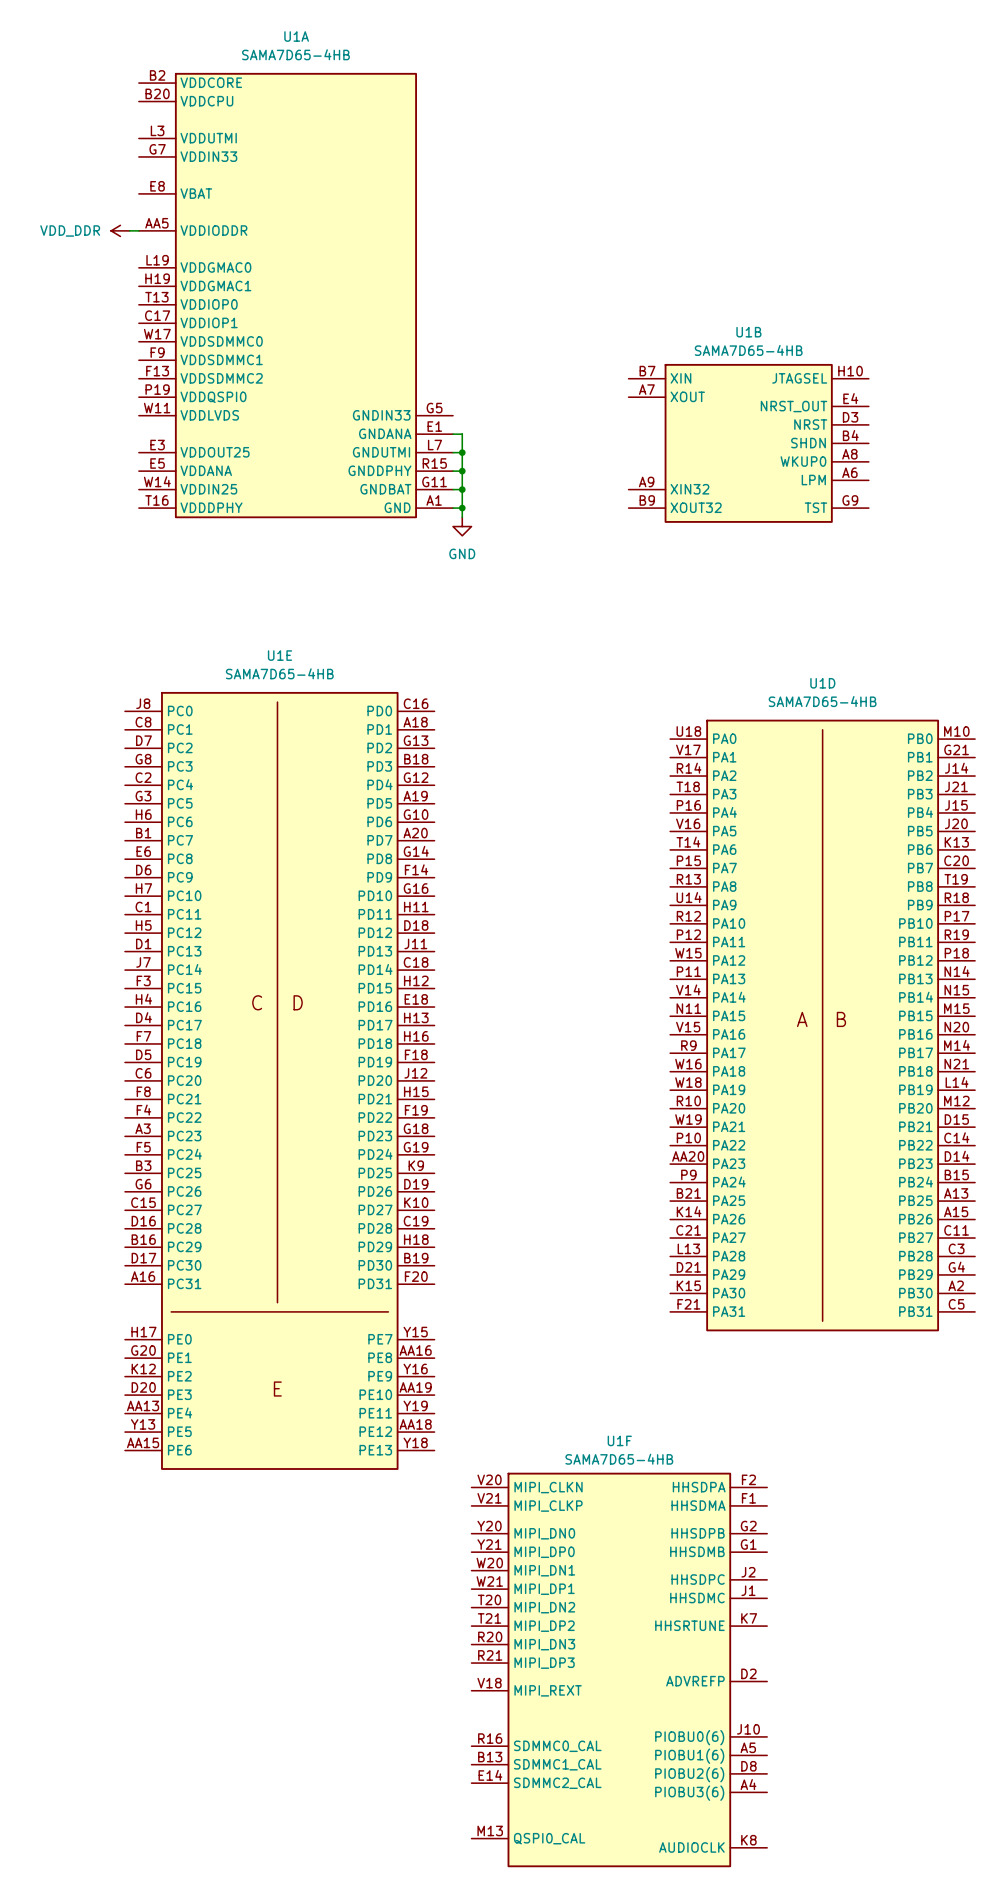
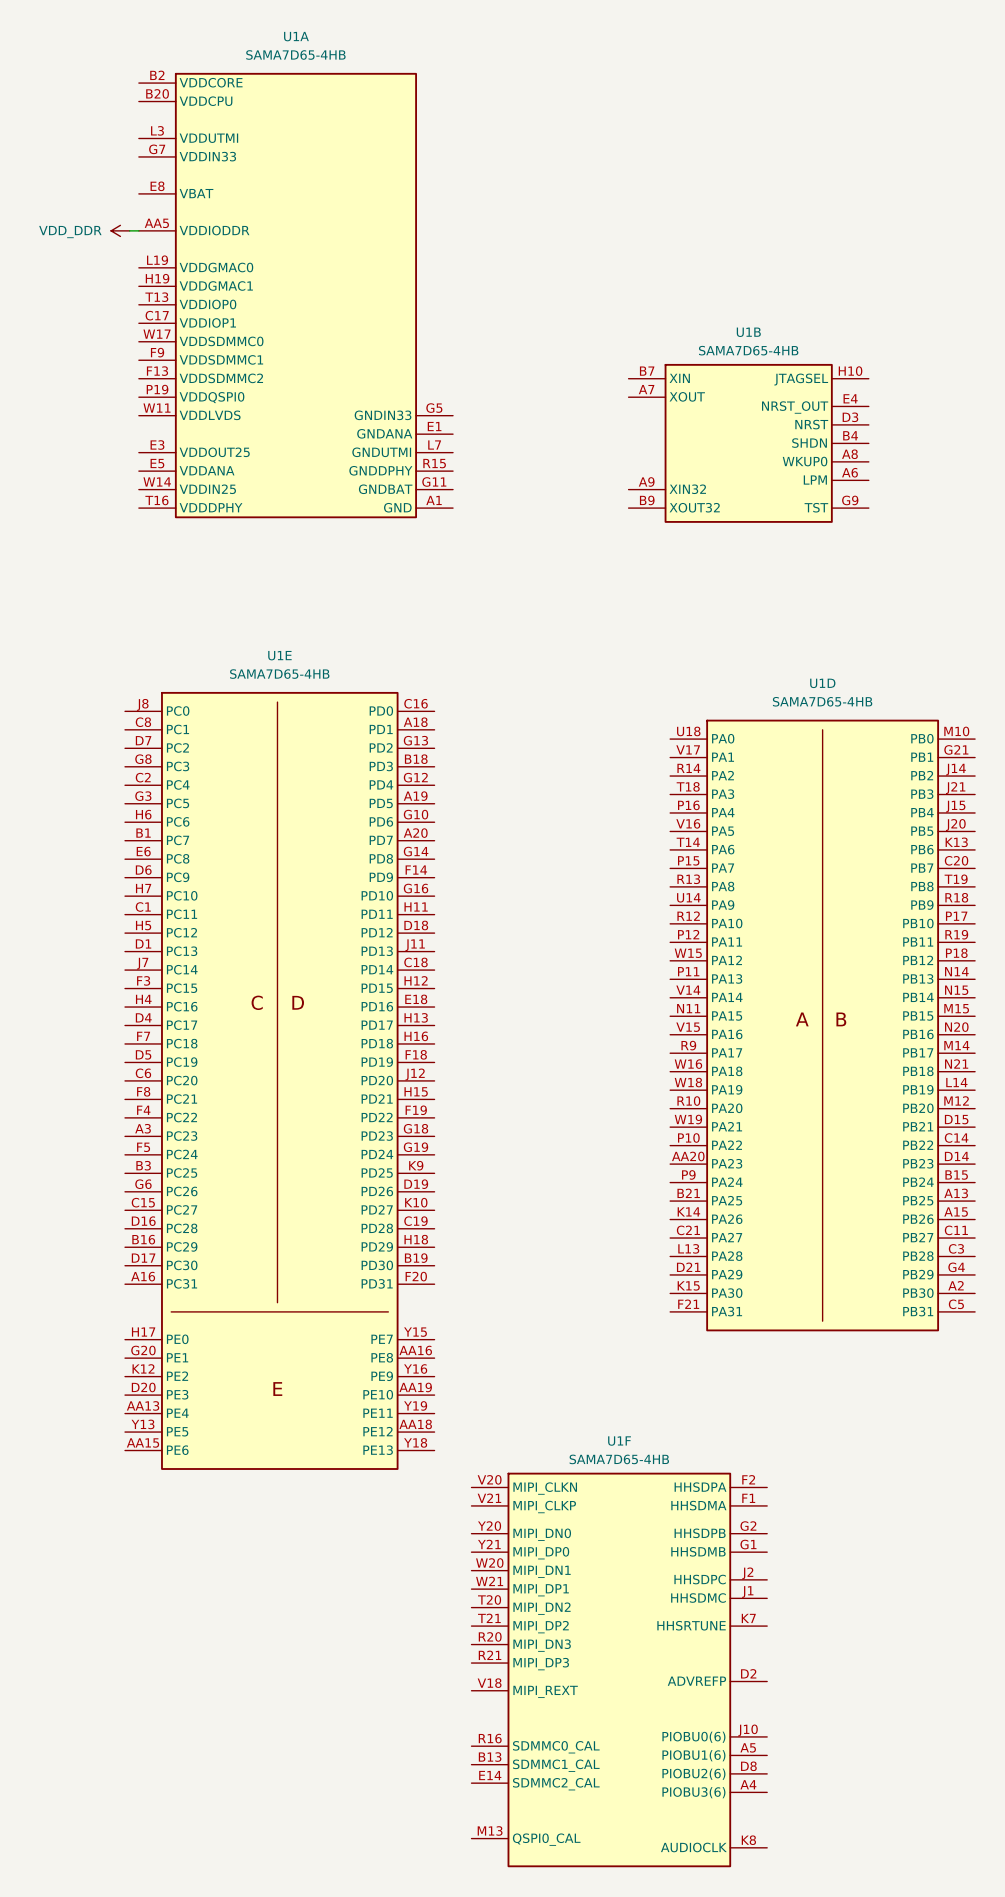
wire: (453, 434) (462, 434) (462, 517) -> none
wire: (453, 452) (462, 452) -> none
junction: (462, 452) -> none
wire: (453, 471) (462, 471) -> none
junction: (462, 471) -> none
wire: (453, 489) (462, 489) -> none
junction: (462, 489) -> none
wire: (453, 508) (462, 508) -> none
junction: (462, 508) -> none
power symbol: GND (462, 526) -> none

